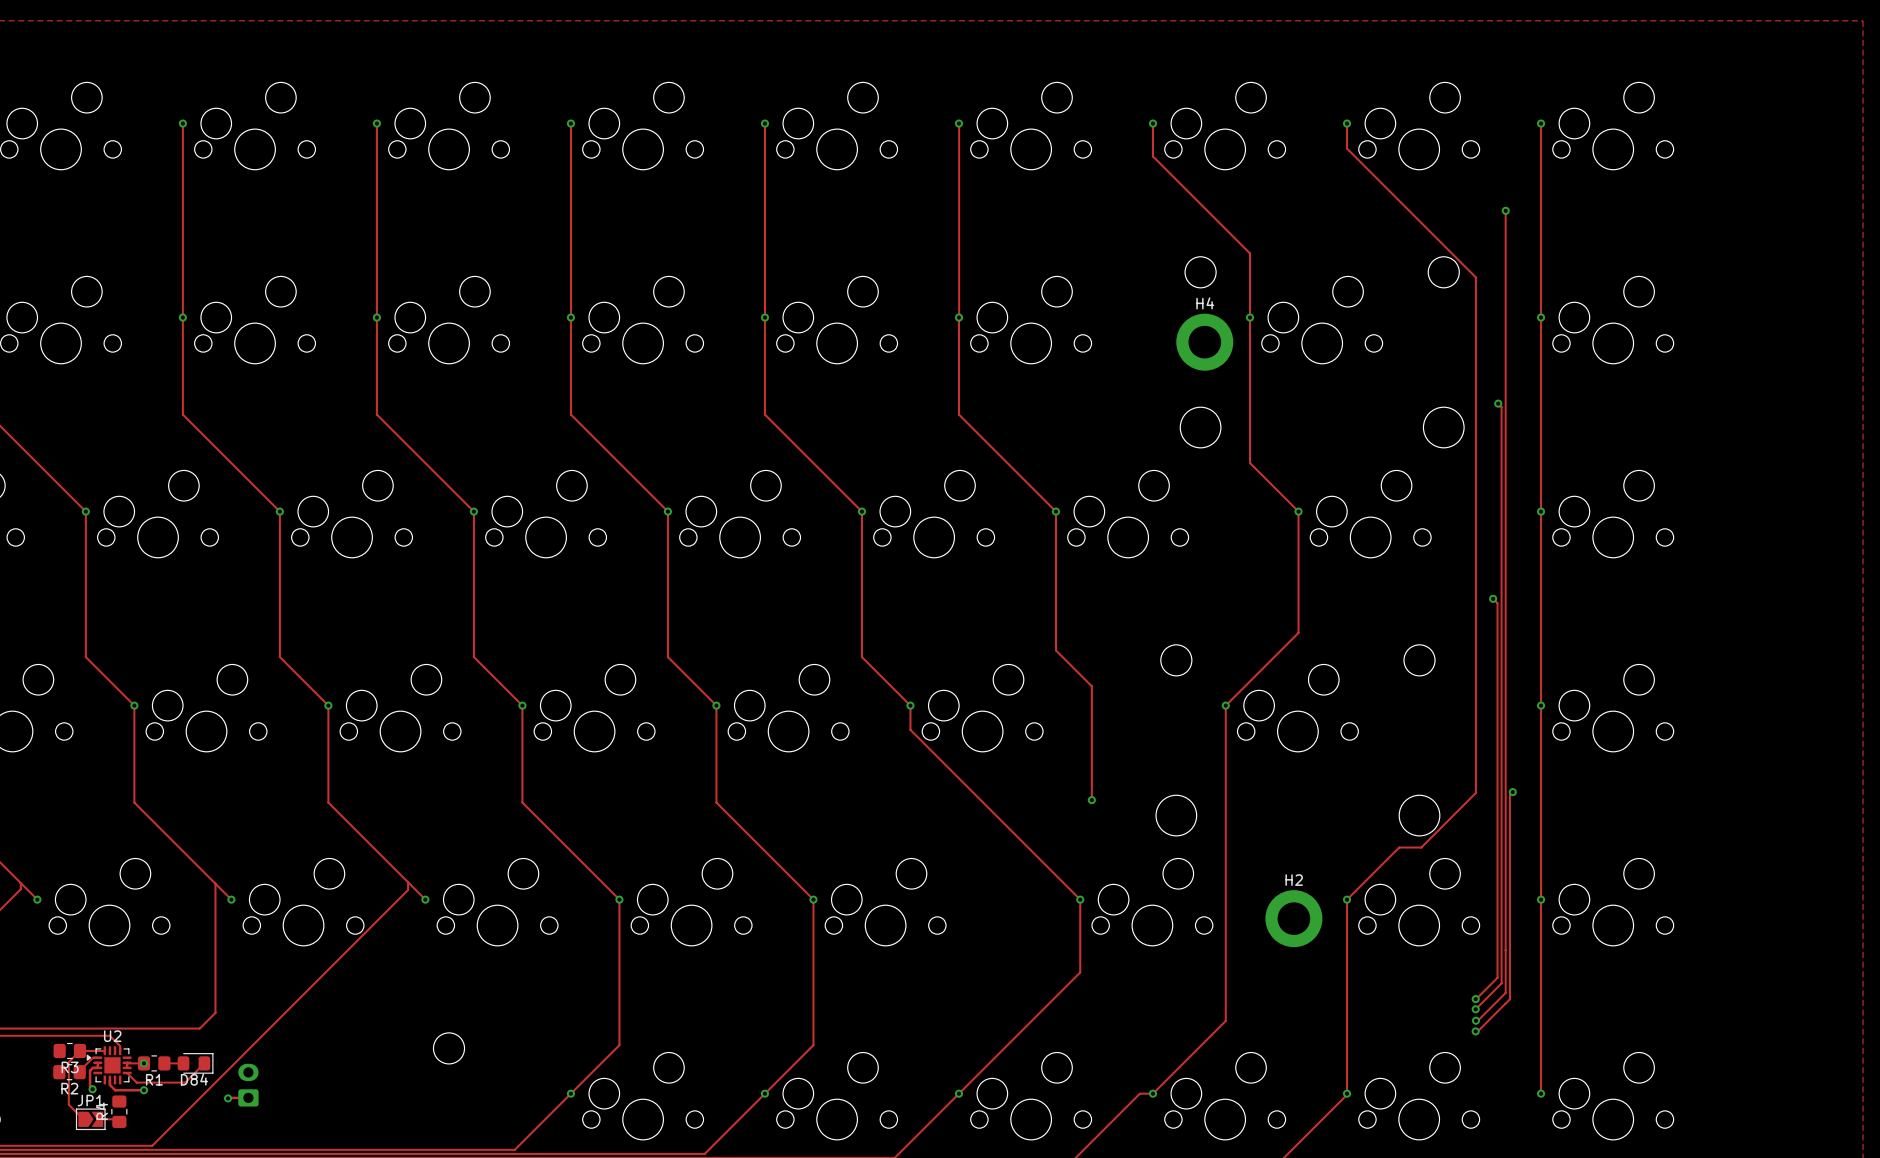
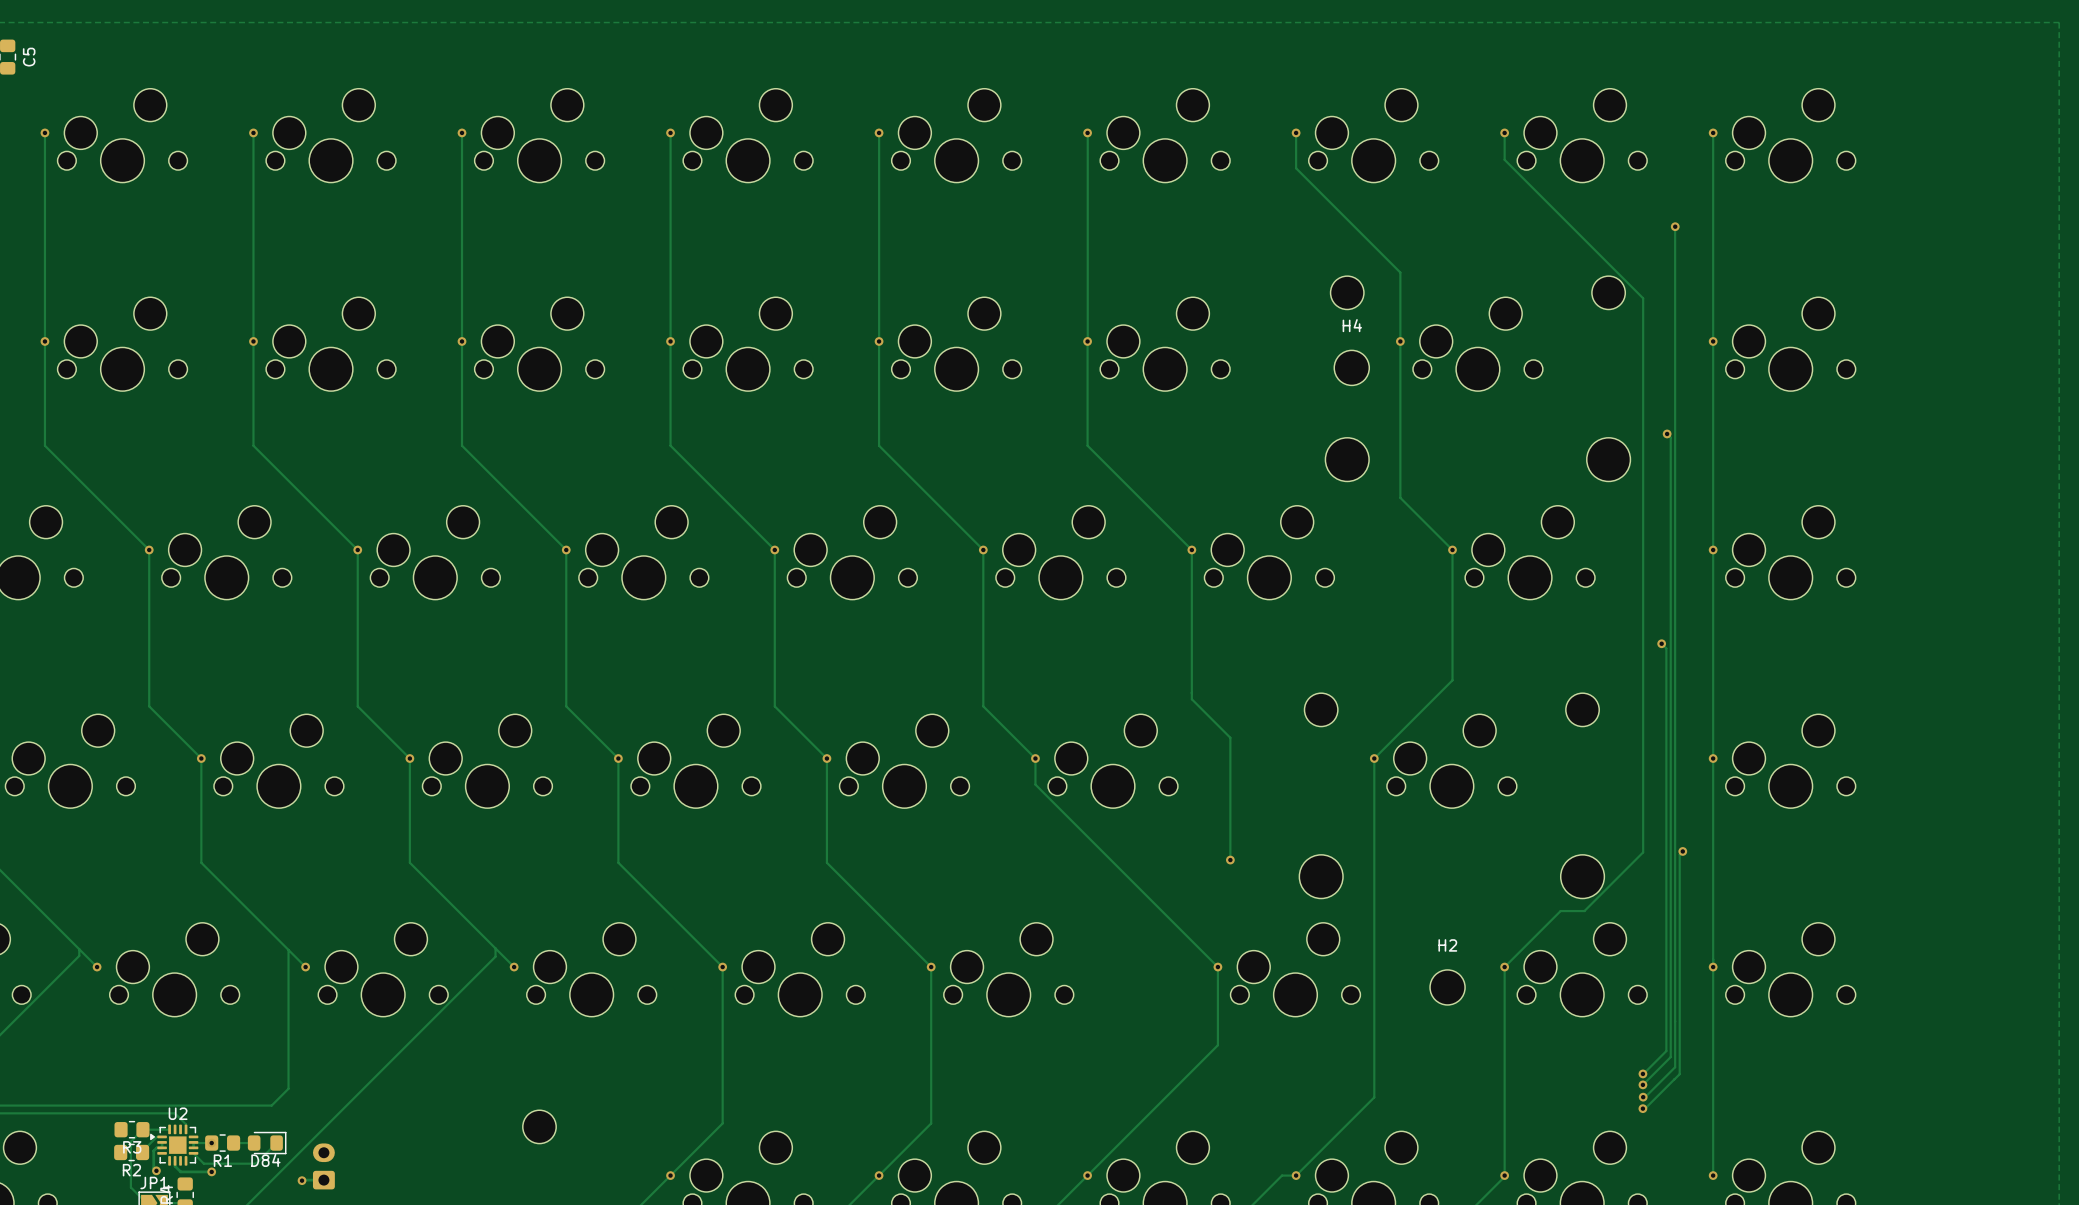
H4 footprint: [1176, 313, 1234, 371] -> [1334, 350, 1370, 386]
H2 footprint: [1265, 890, 1323, 948] -> [1430, 969, 1466, 1005]

